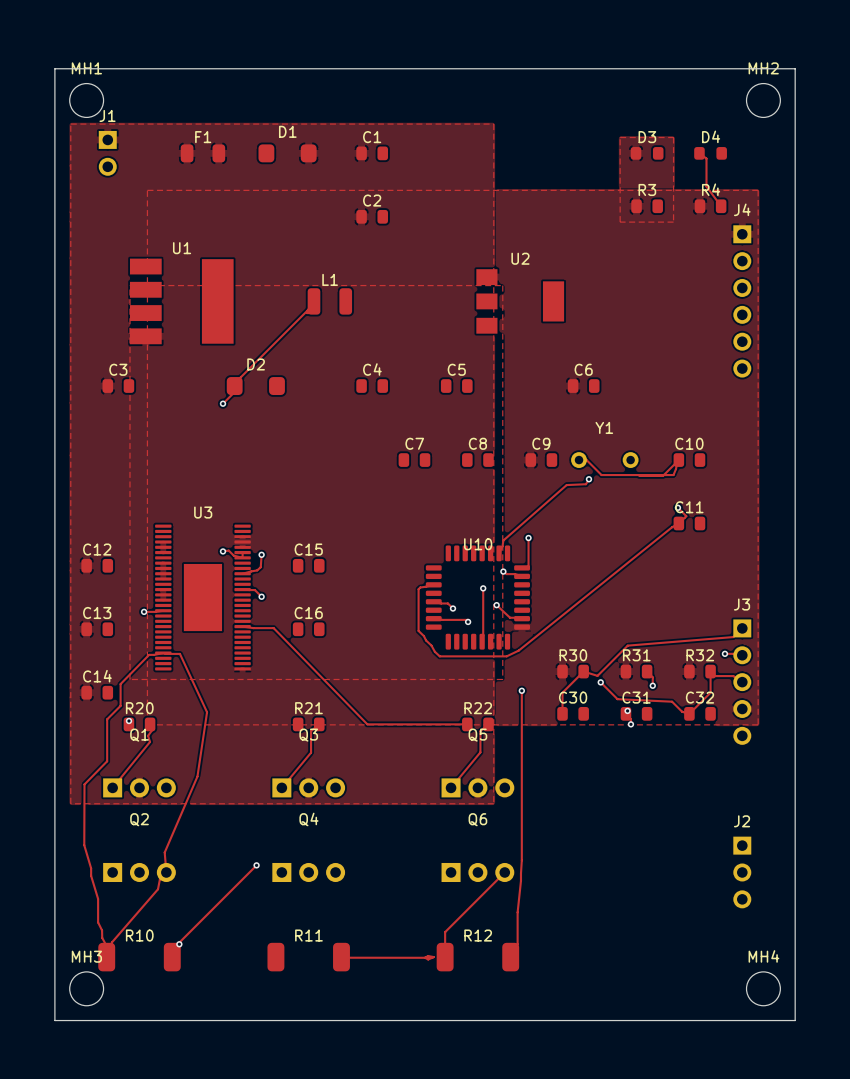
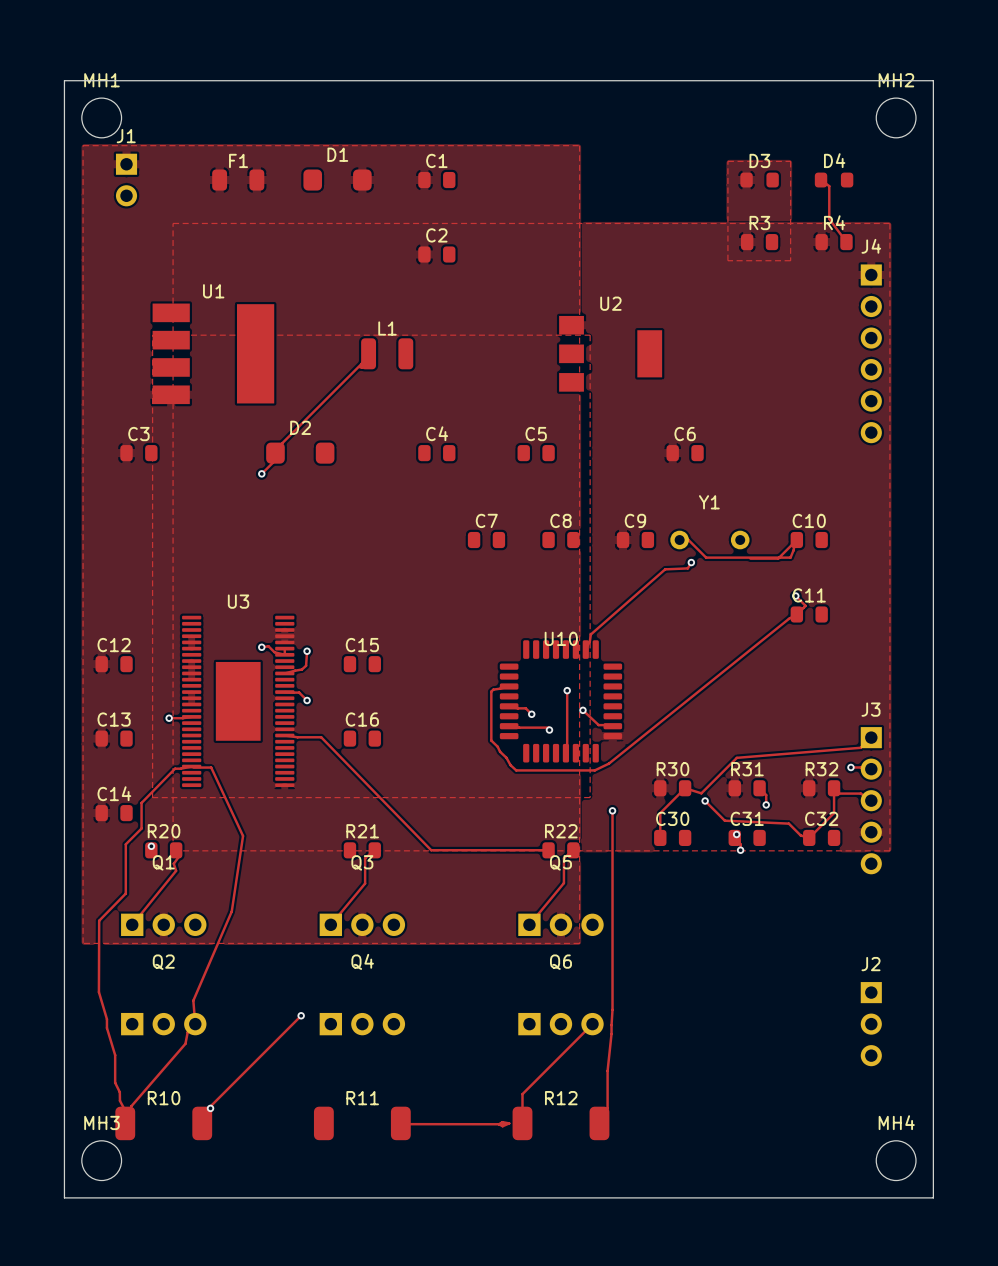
track: (528, 538) (528, 566) (522, 567) -> none
via: (528, 538) -> none
track: (503, 571) (506, 574) (522, 576) -> none
via: (503, 571) -> none

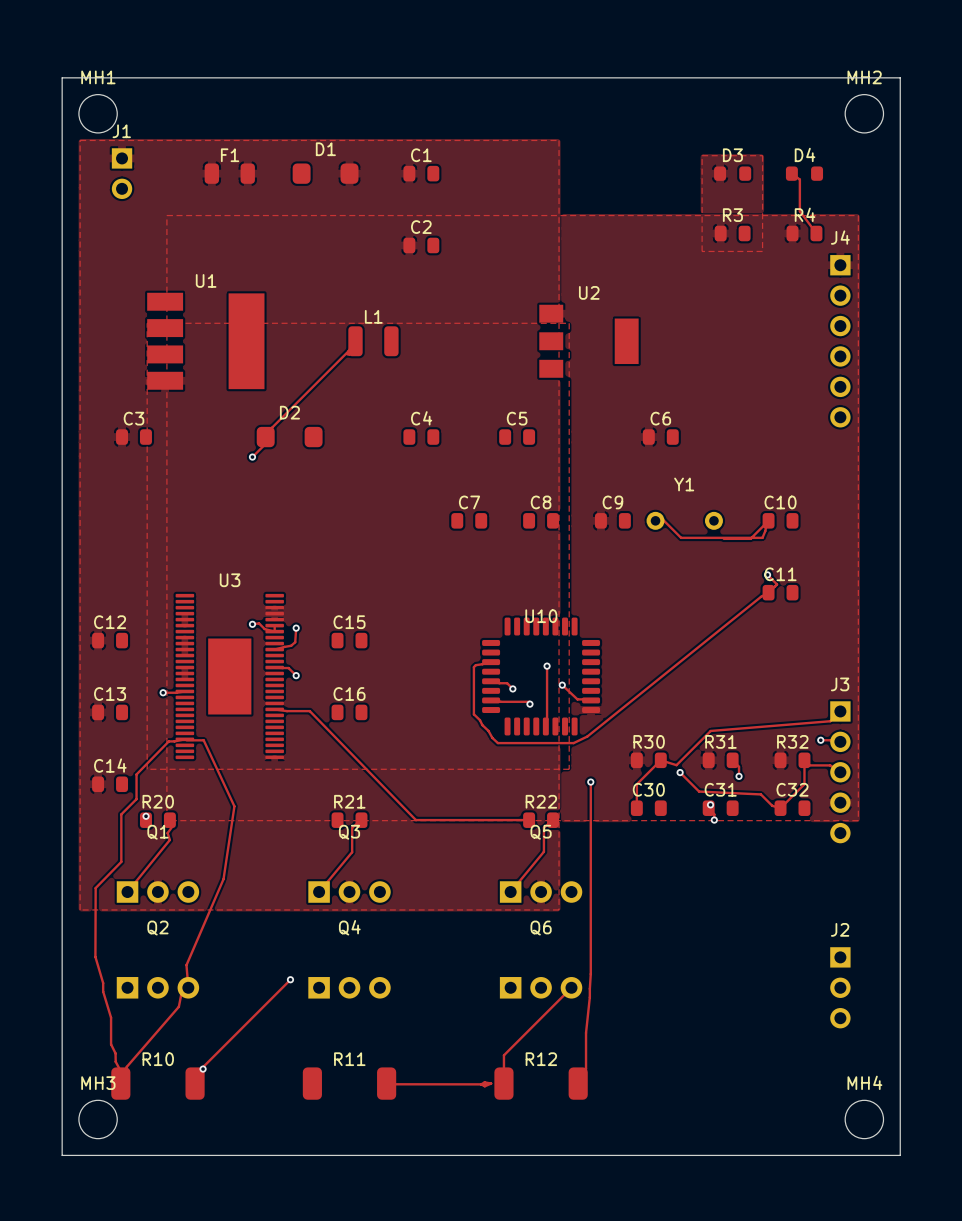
track: (691, 562) (687, 568) (665, 569) (590, 634) (585, 649) -> none
via: (691, 562) -> none

